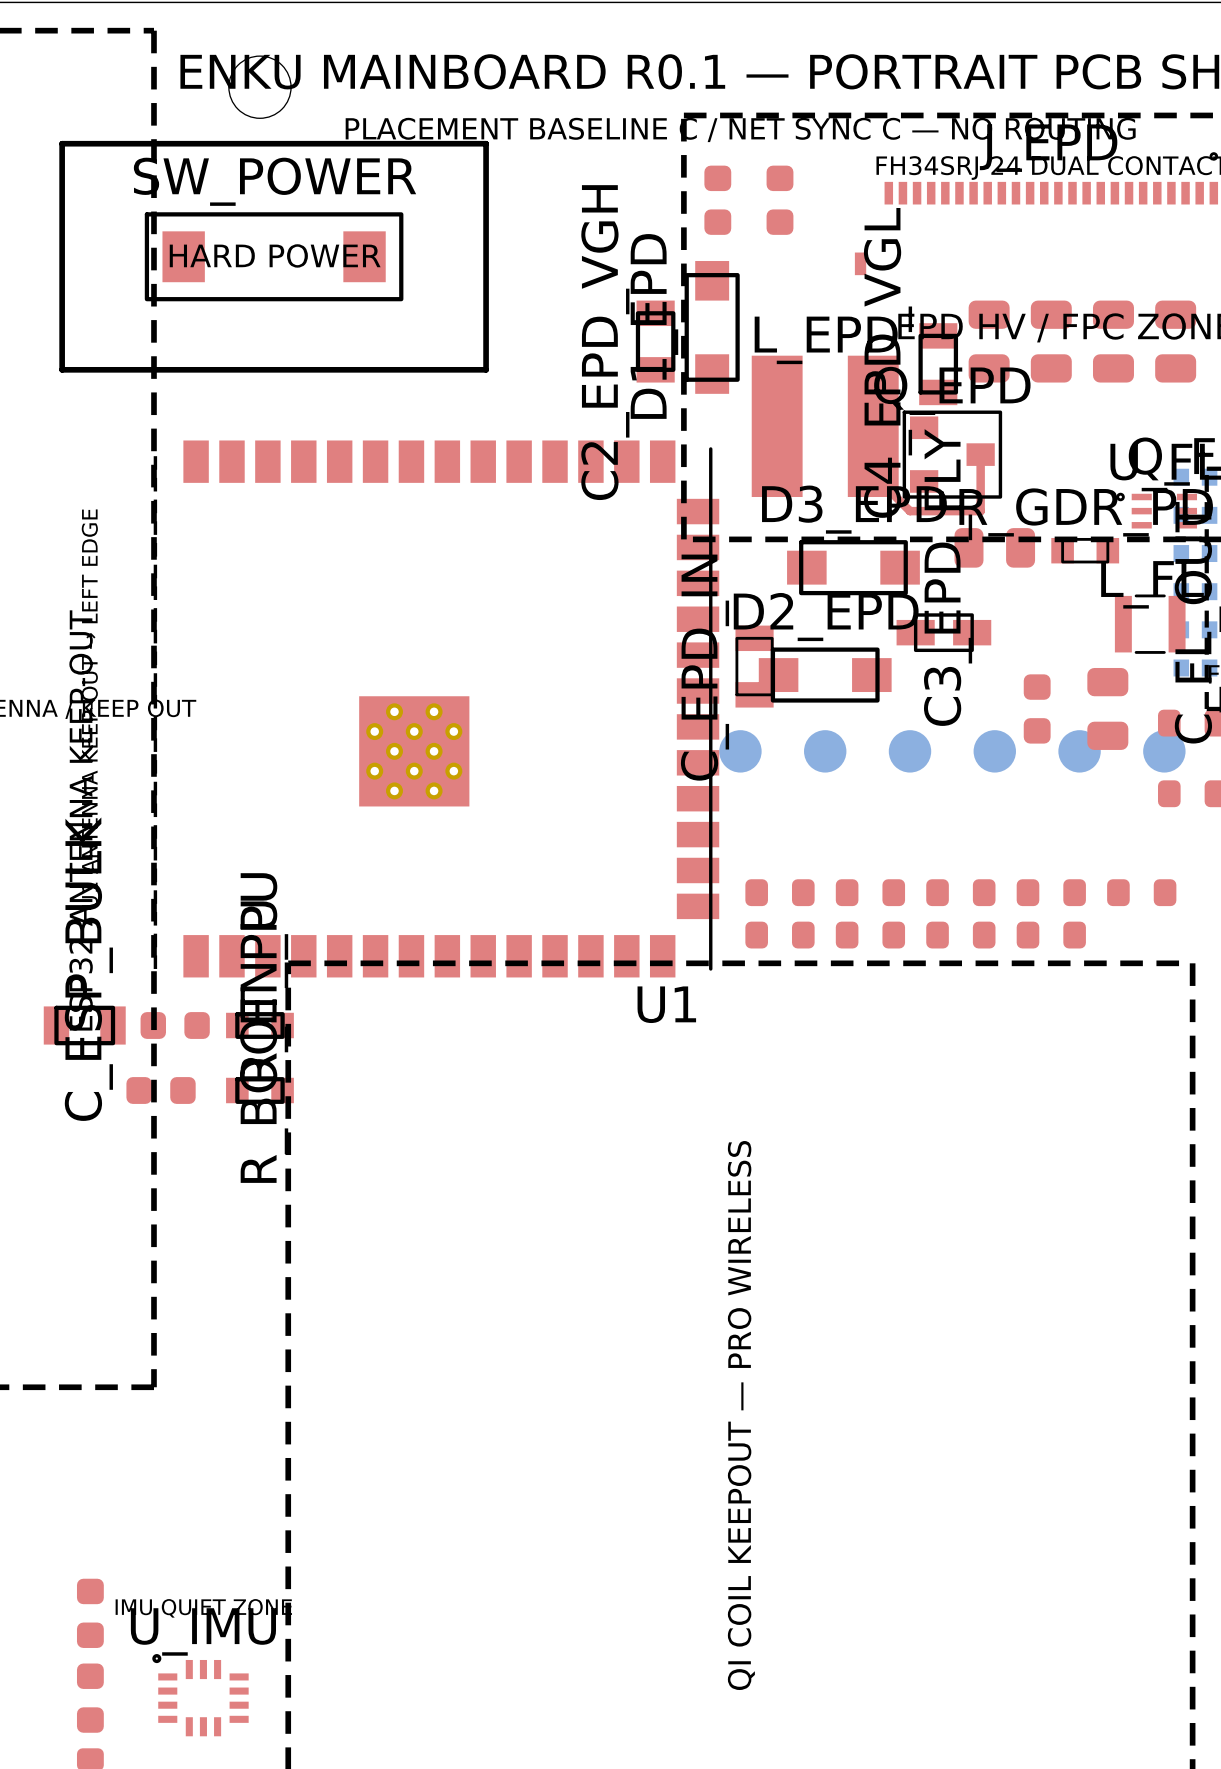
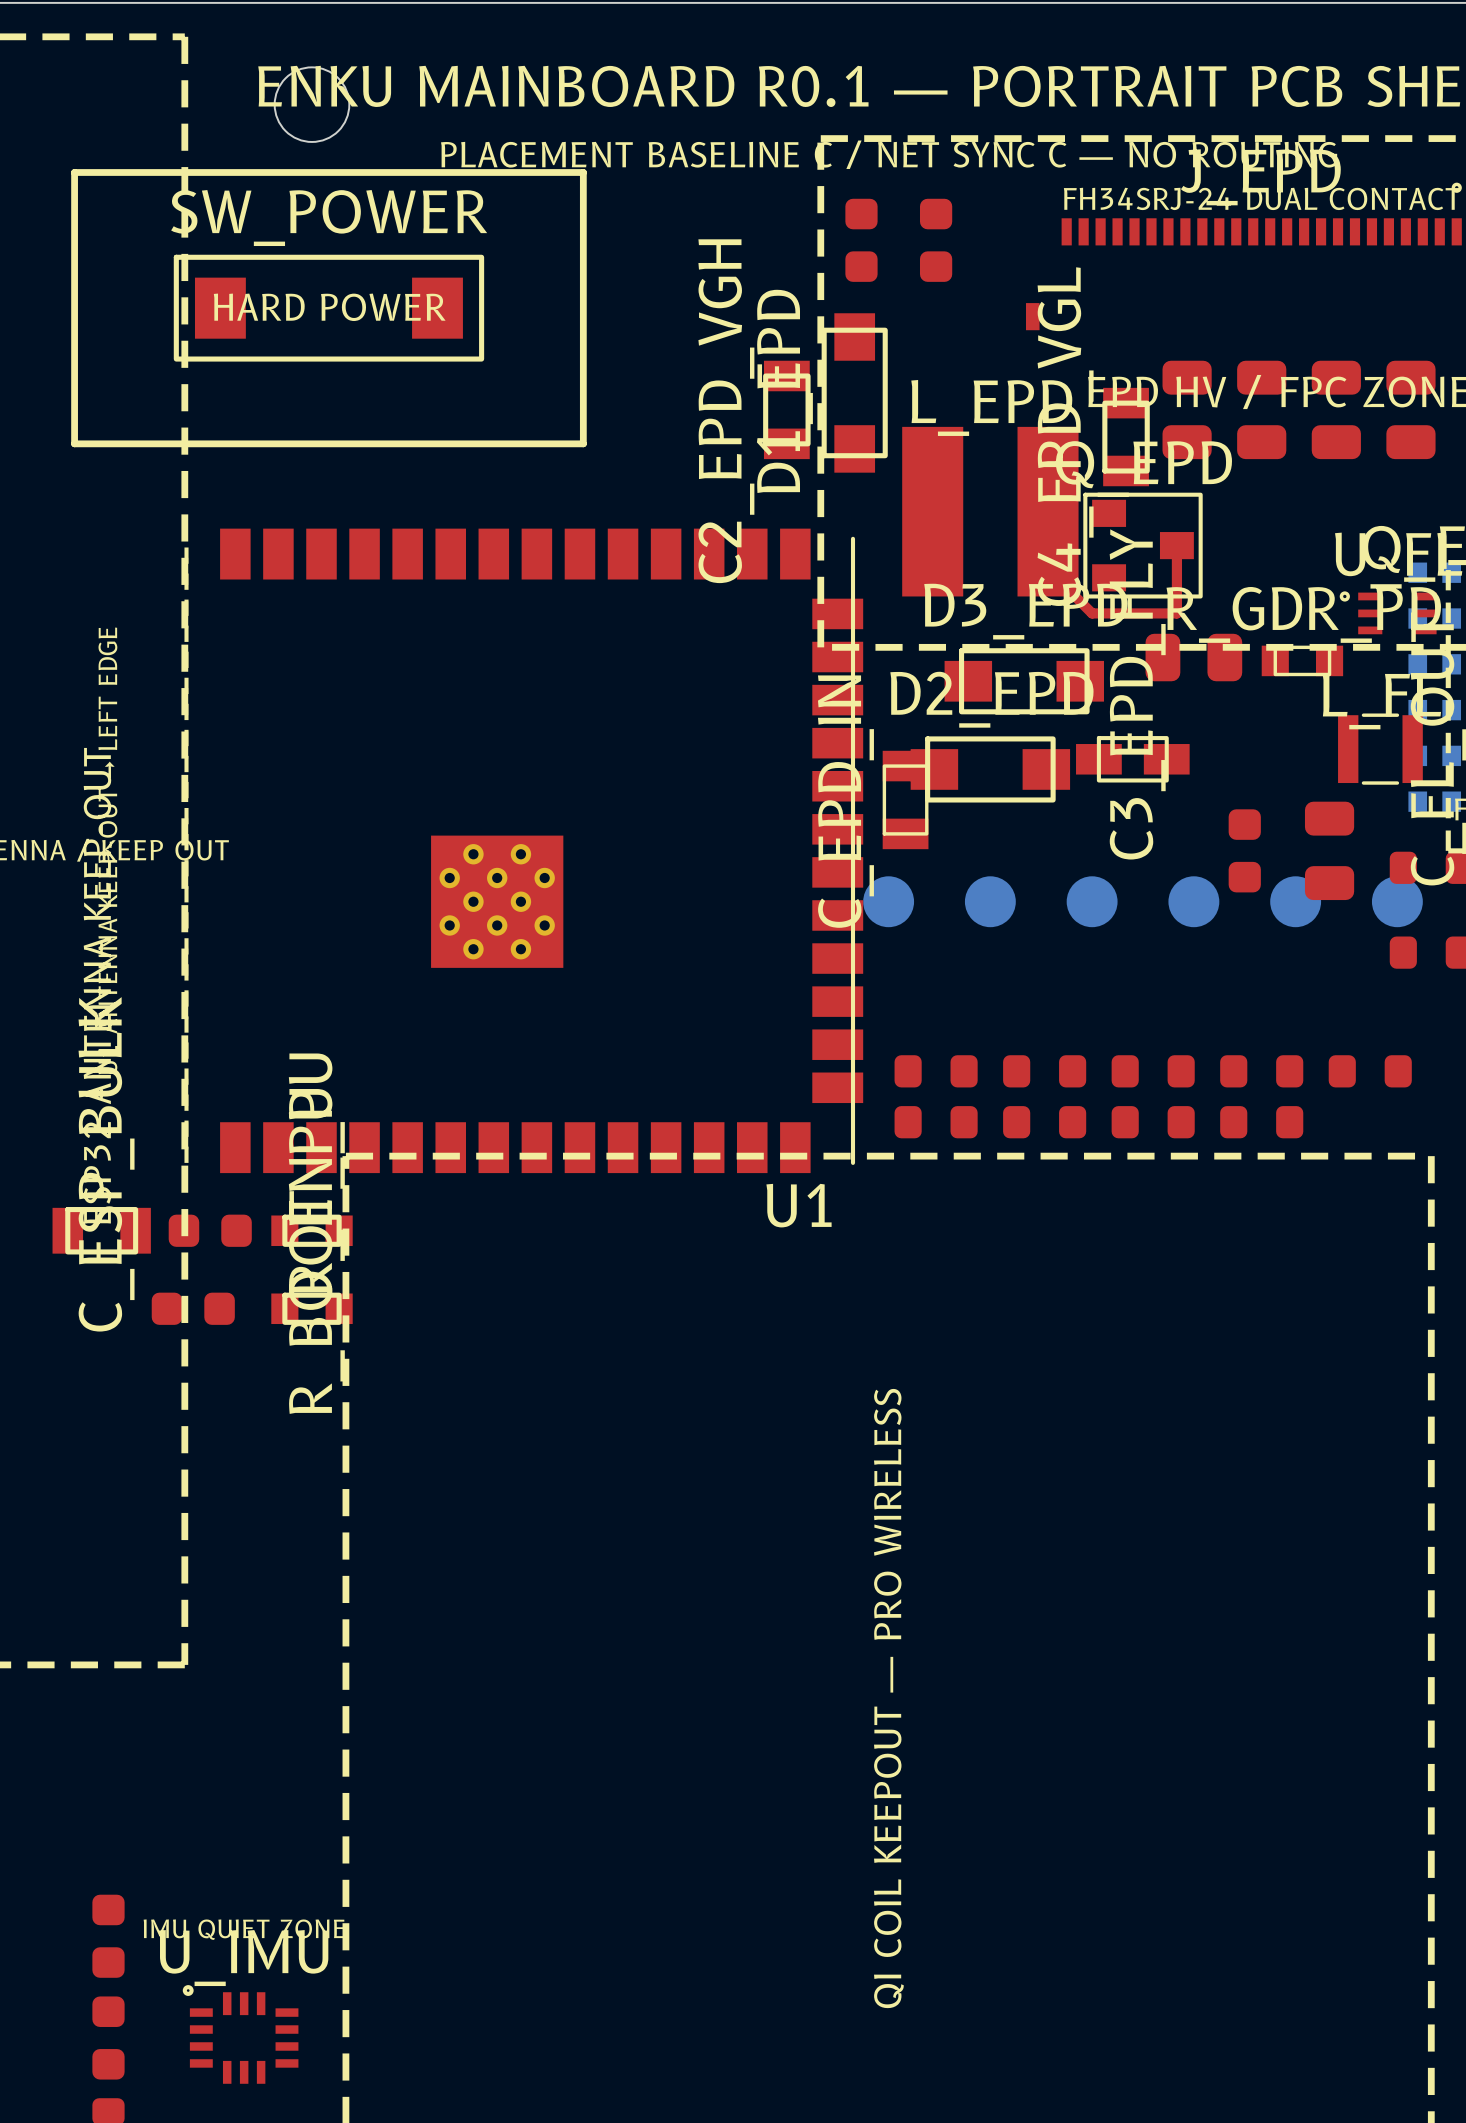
D2_EPD position: (825, 675) -> (990, 769)

